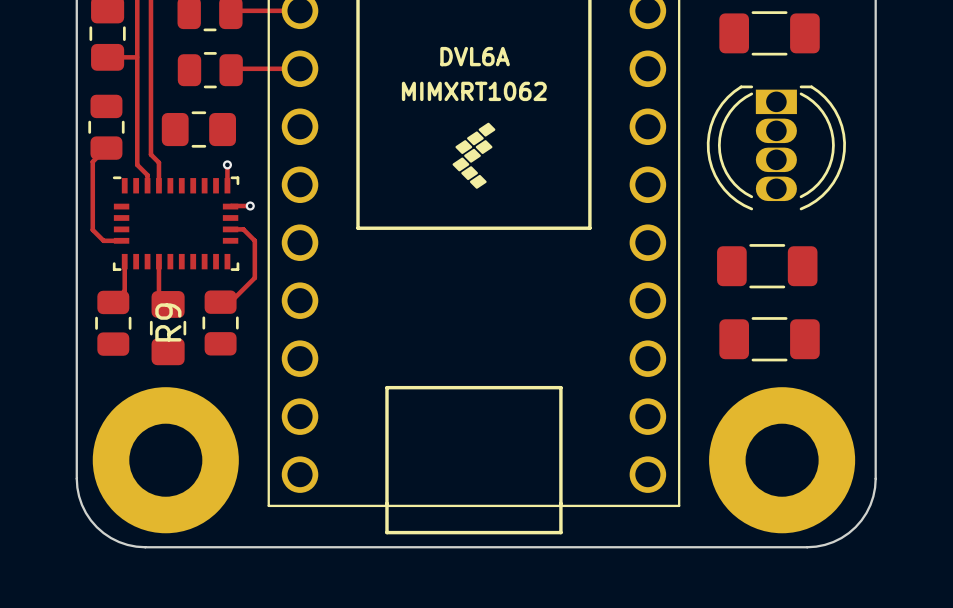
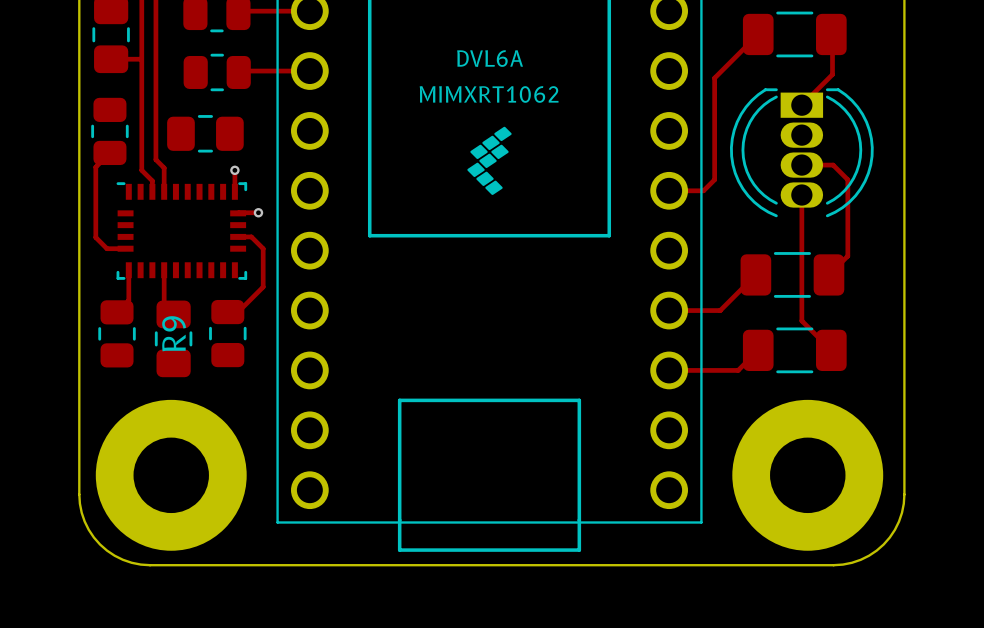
track: none -> (758, 34) (714, 78) (714, 179) (703, 190) (669, 190)
track: none -> (831, 34) (832, 74) (801, 105)
track: none -> (801, 165) (833, 165) (847, 179) (847, 256) (828, 274)
track: none -> (801, 195) (801, 320) (831, 350)
track: none -> (755, 274) (720, 310) (669, 310)
track: none -> (758, 350) (738, 370) (669, 370)

